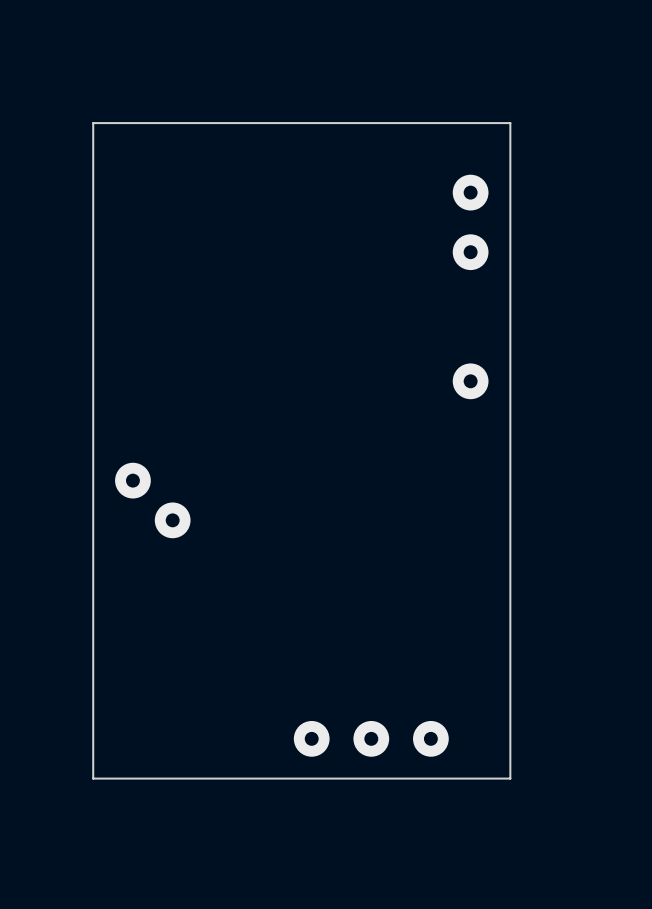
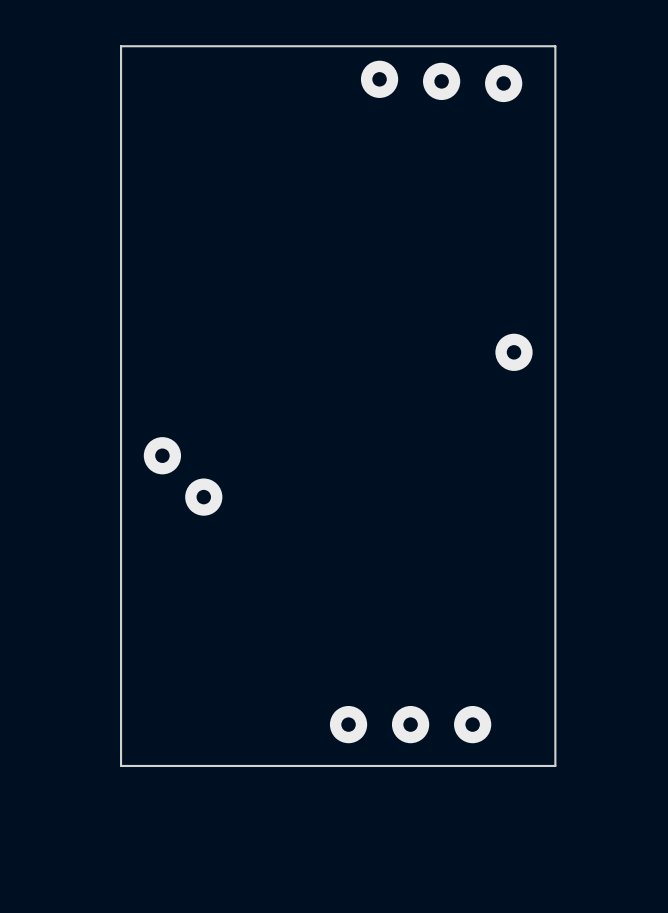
via: none -> (379, 79)
via: none -> (441, 81)
via: none -> (503, 83)
board edge: (510, 123) (93, 123) -> (555, 83) (555, 46) (121, 46) (121, 83)
via: (470, 192) -> none
via: (470, 252) -> none

